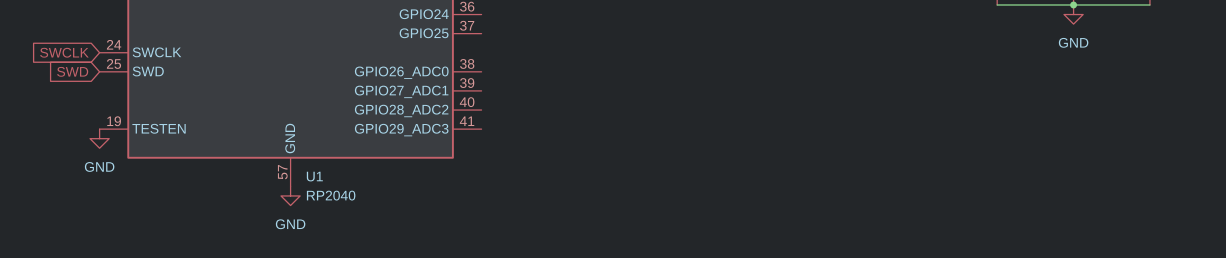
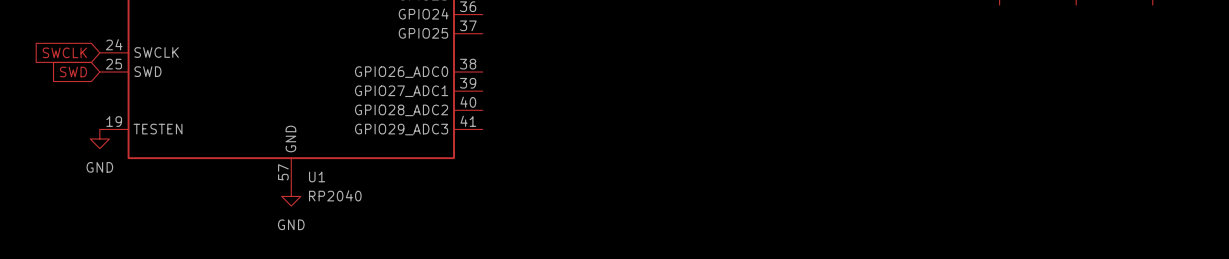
wire: (997, 4) (1149, 4) -> none
junction: (1073, 4) -> none
power symbol: GND (1073, 14) -> none

